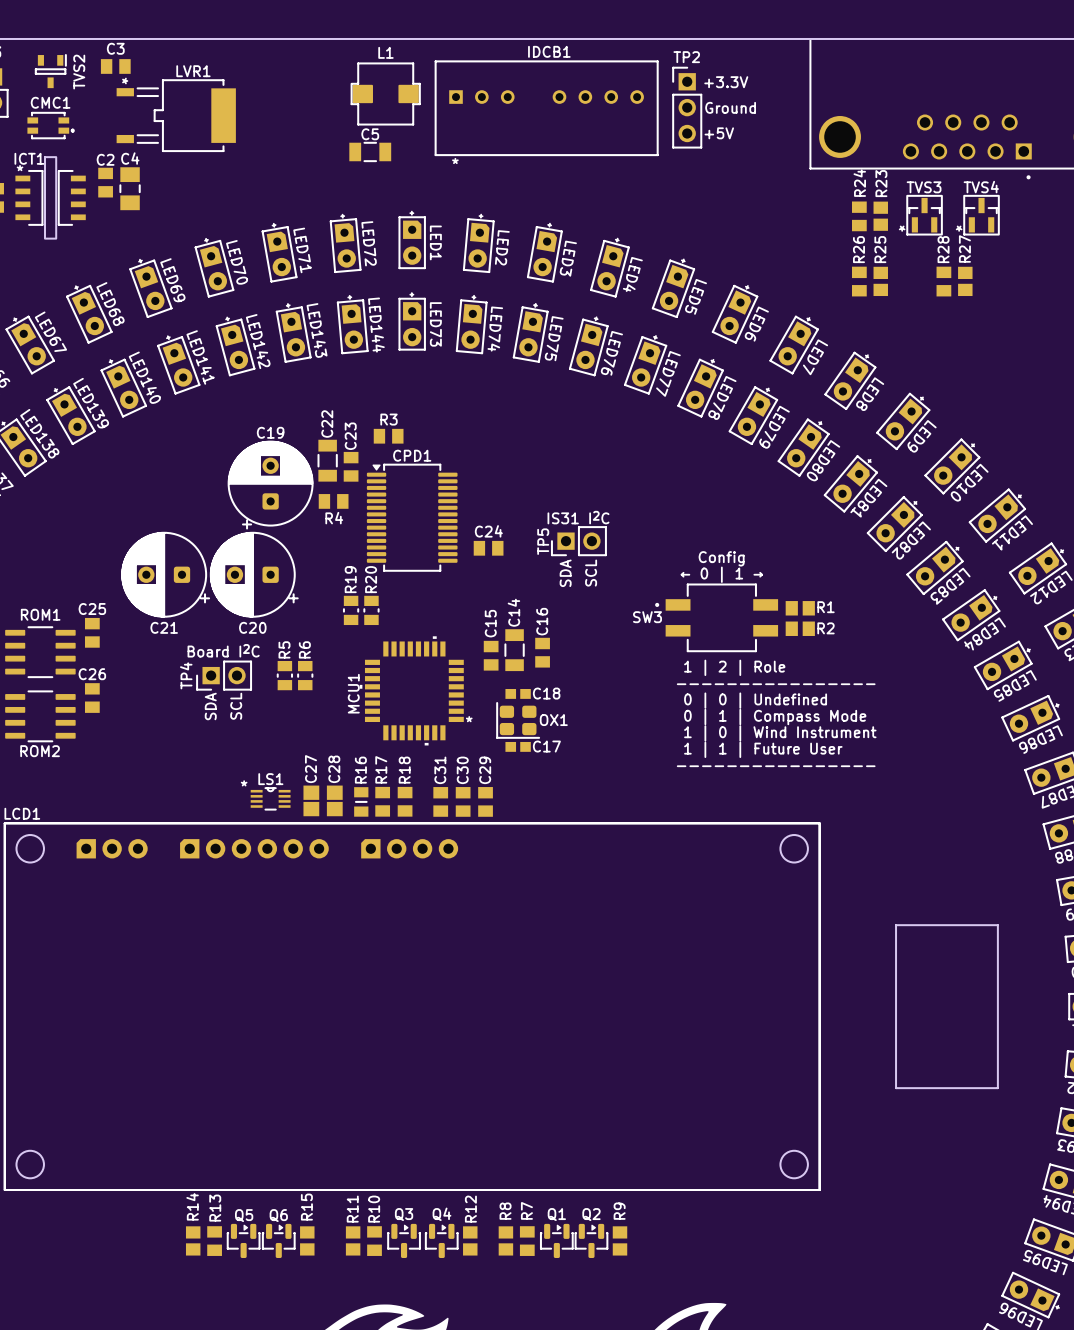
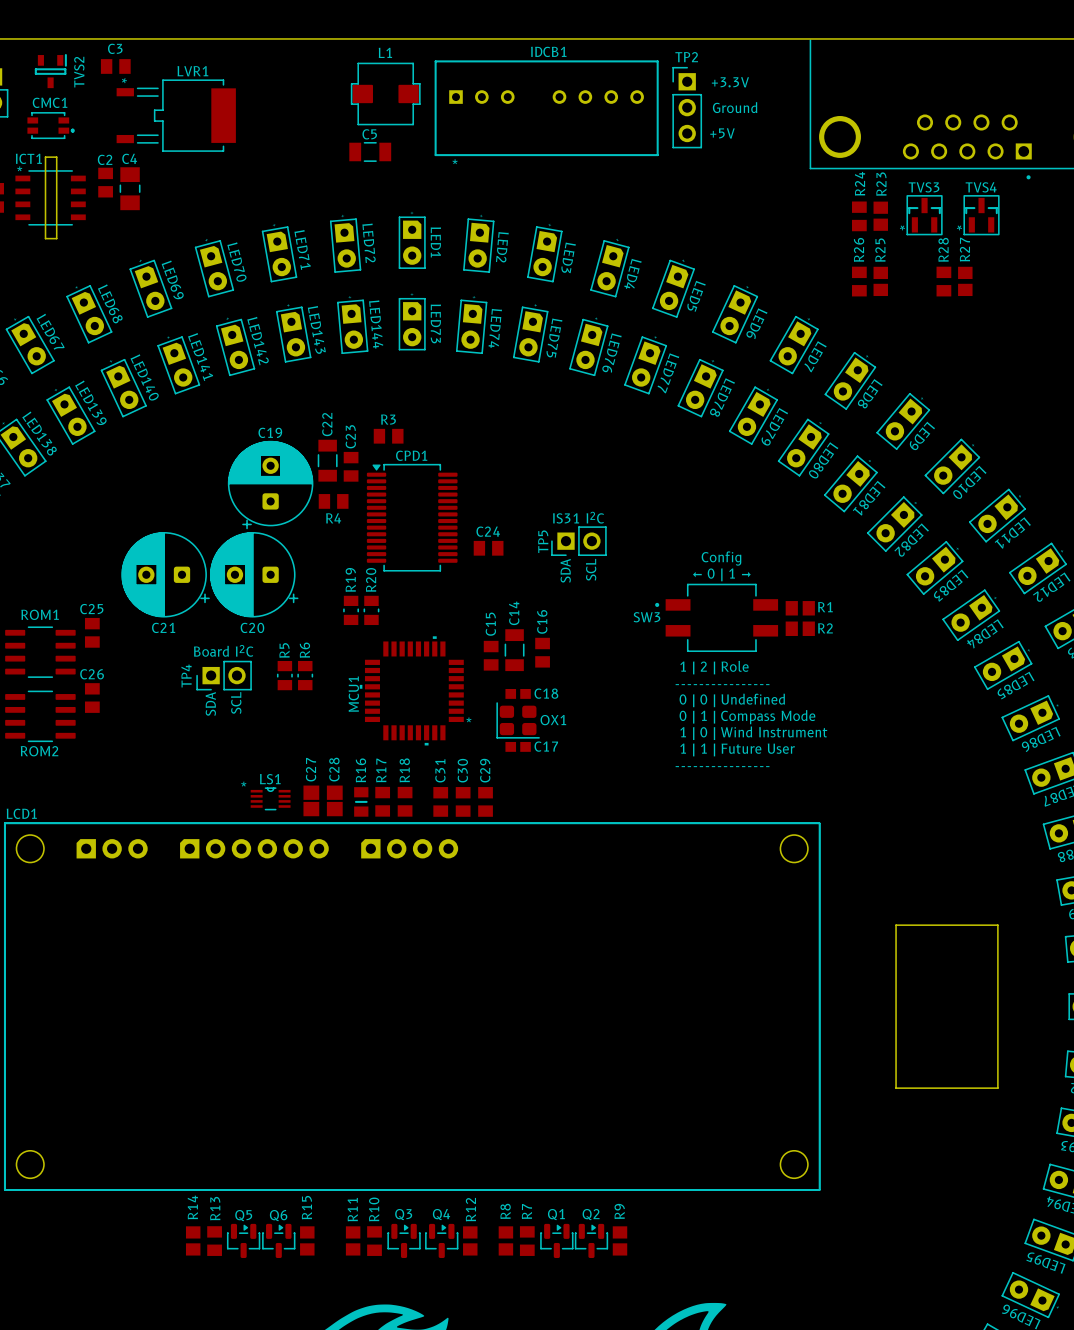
ICT1 footprint: [15, 156, 86, 239] -> [15, 170, 86, 226]
board edge: none -> (45, 157) (56, 157) (56, 238) (45, 238) (45, 157)

